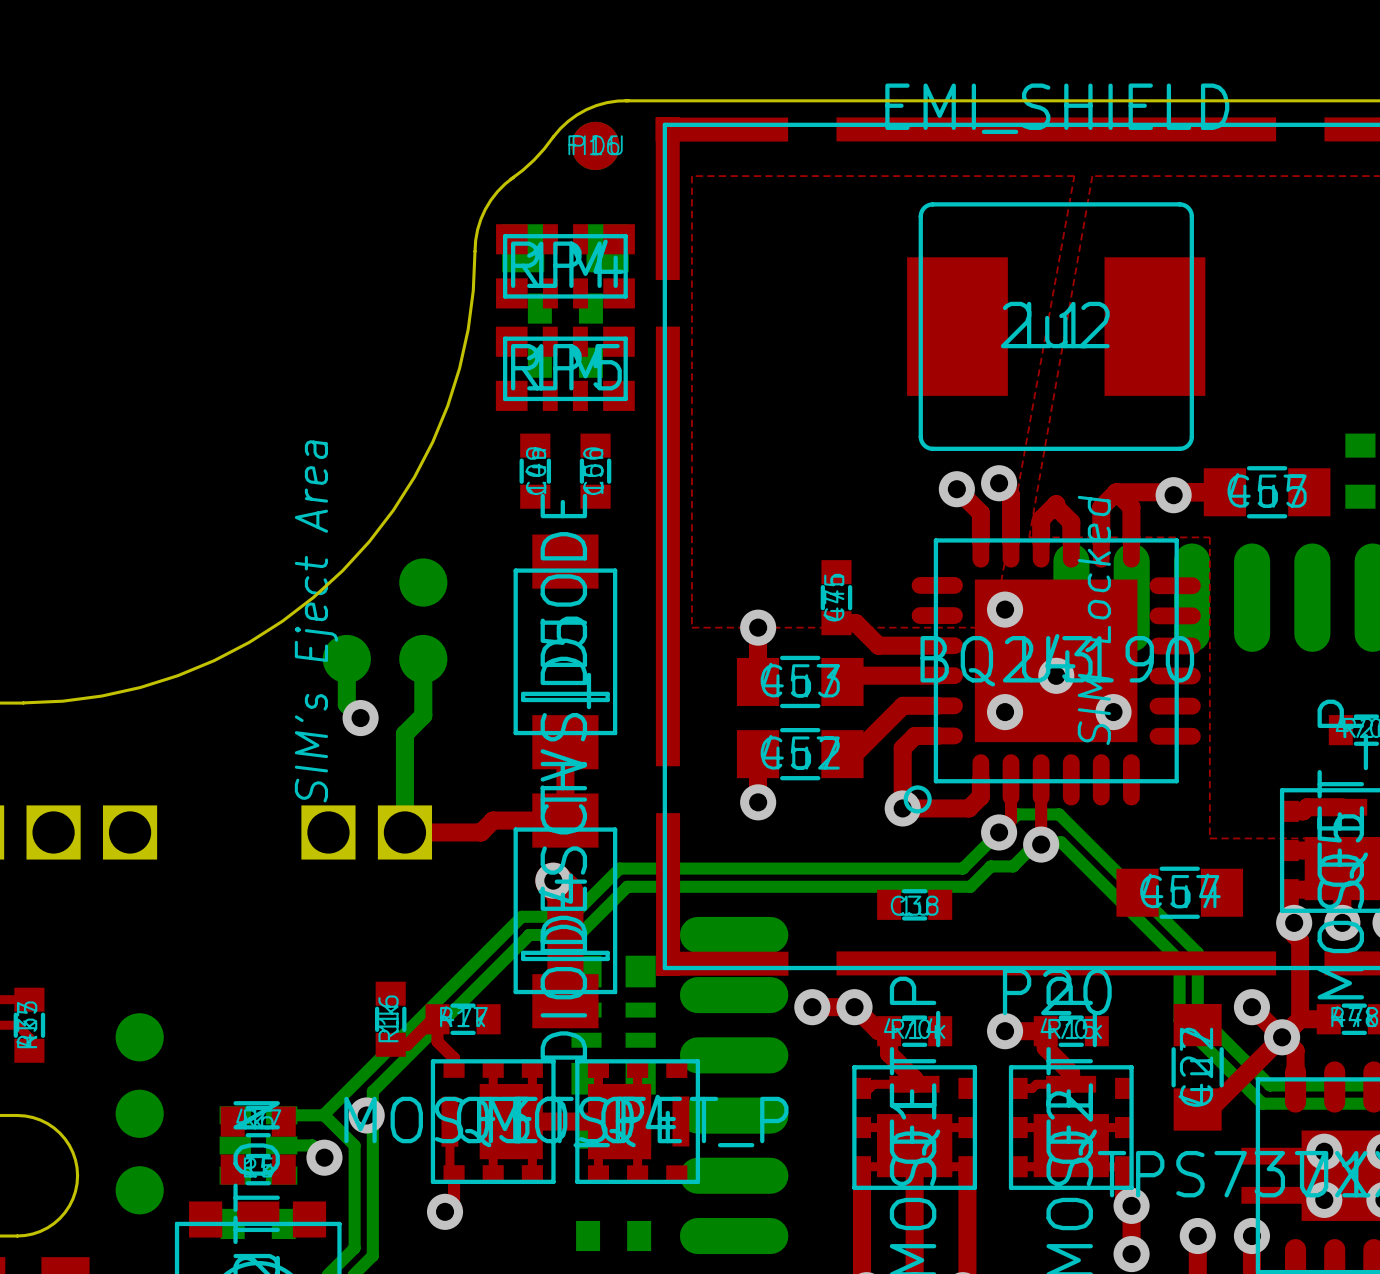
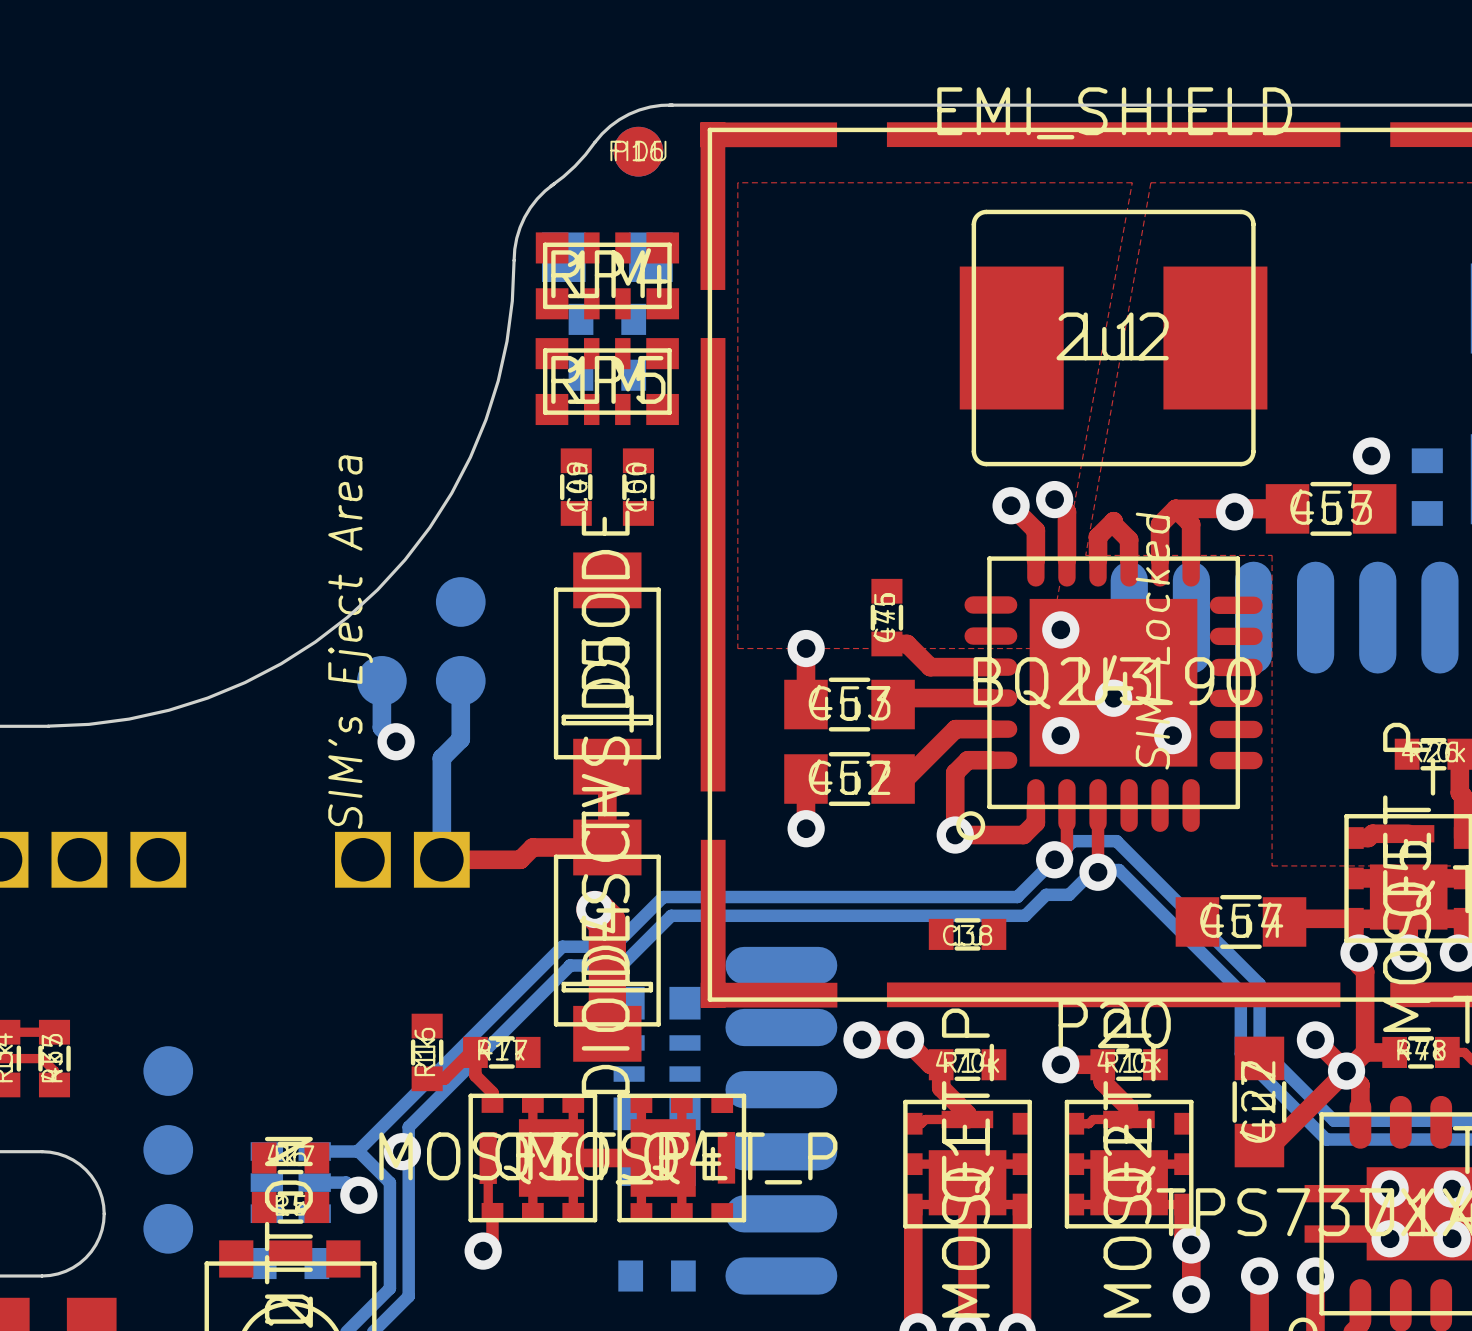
via: none -> (1371, 456)
top track: none -> (1354, 918) (1287, 918) (1284, 921)

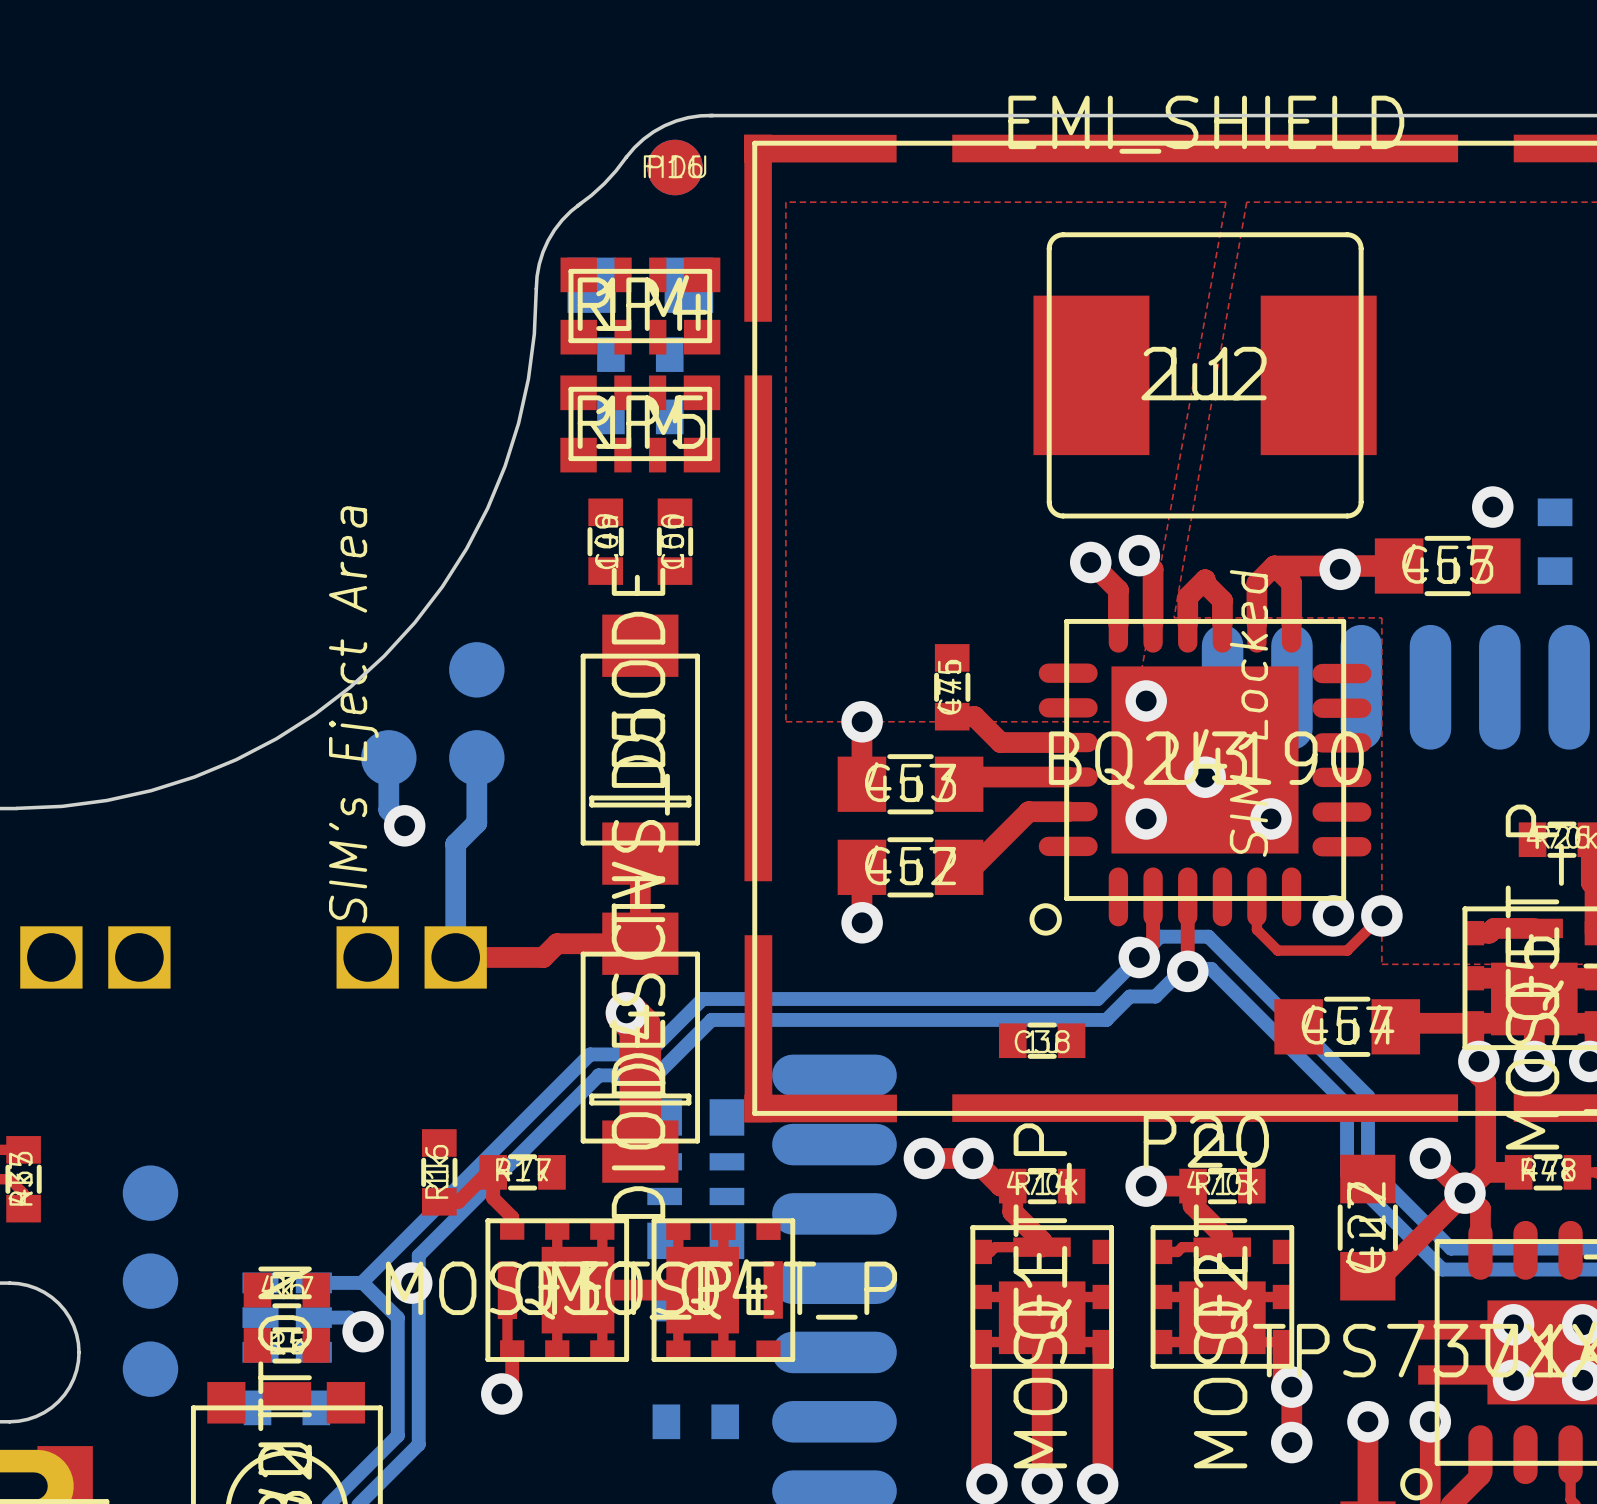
top track: (990, 760) (967, 760) (955, 772) (955, 835) (1023, 835) (1035, 822) (1035, 805) -> none
top track: none -> (1256, 896) (1256, 929) (1277, 950) (1347, 950) (1381, 915)
via: none -> (1333, 915)
via: none -> (1381, 915)
via: (955, 835) -> none

